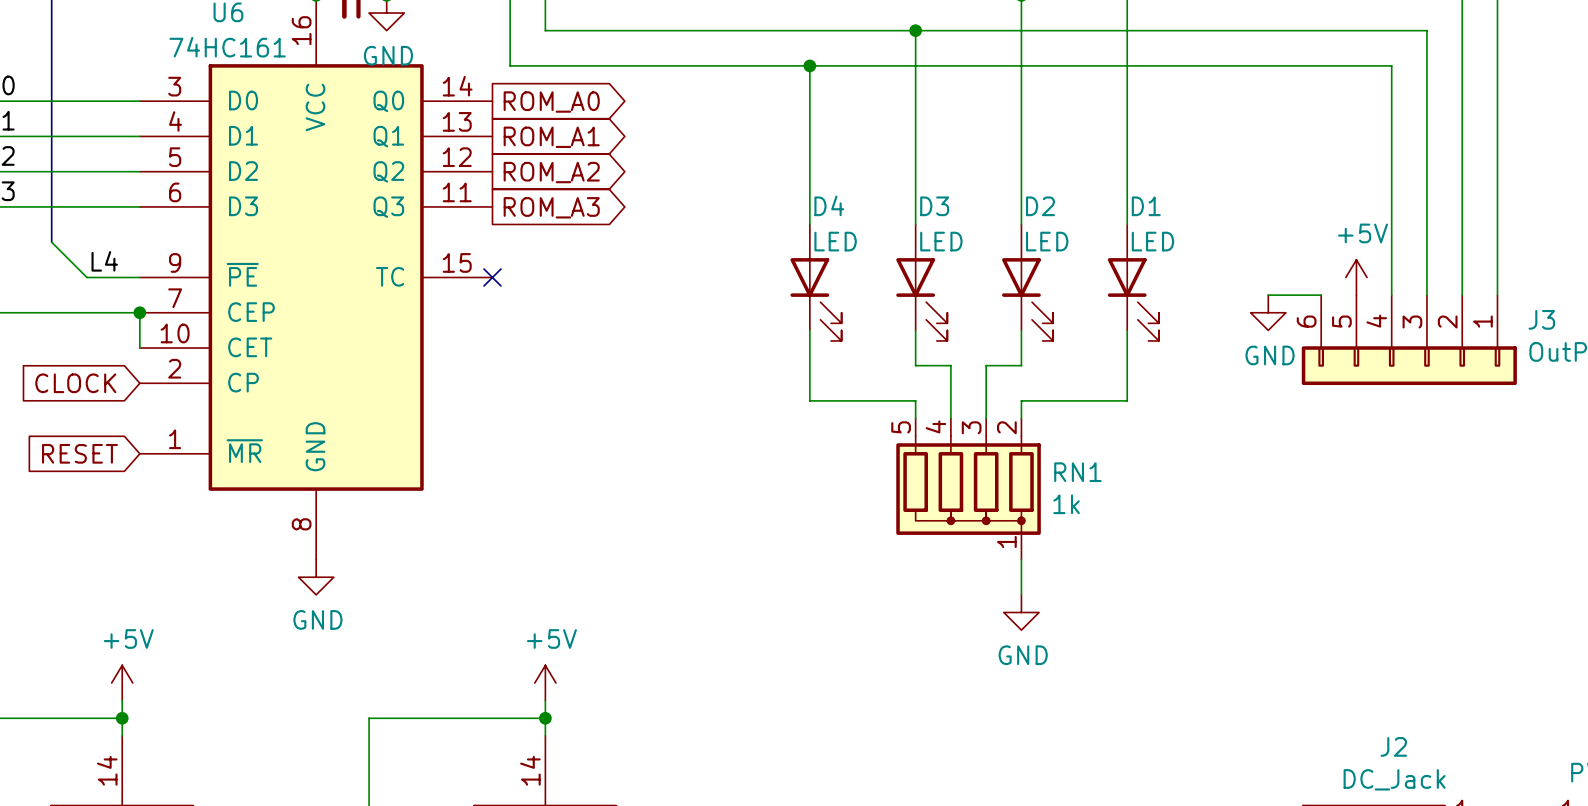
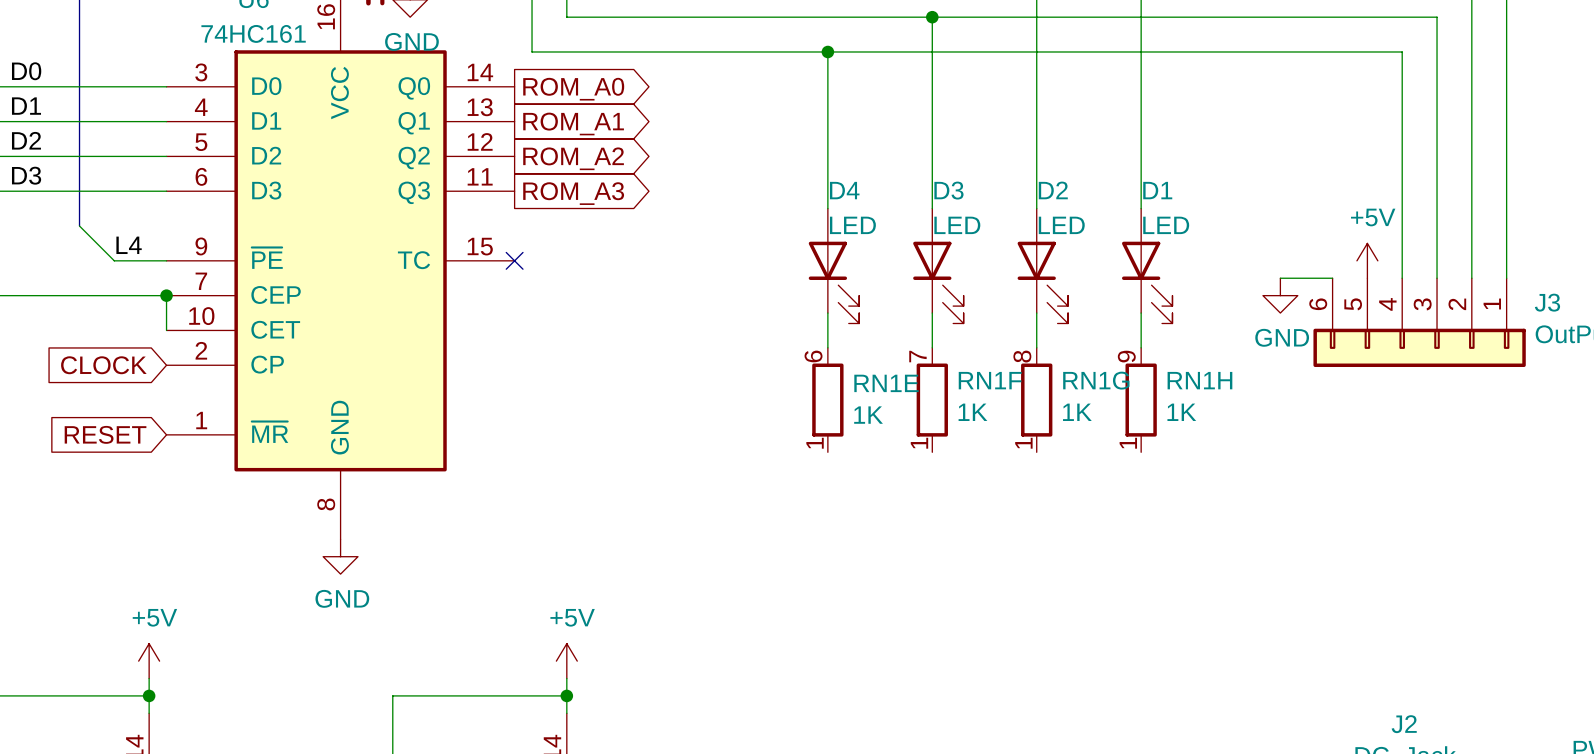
wire: (809, 365) (809, 400) (915, 400) (915, 418) -> none
wire: (915, 365) (950, 365) (950, 418) -> none
wire: (1021, 365) (986, 365) (986, 418) -> none
wire: (1127, 365) (1127, 400) (1021, 400) (1021, 418) -> none
RN1E: none -> 1K (827, 400)
RN1F: none -> 1K (932, 400)
RN1G: none -> 1K (1036, 400)
RN1H: none -> 1K (1141, 400)
RN1: 1k (968, 489) -> none
wire: (1021, 559) (1021, 594) -> none
power symbol: GND (1021, 612) -> none

